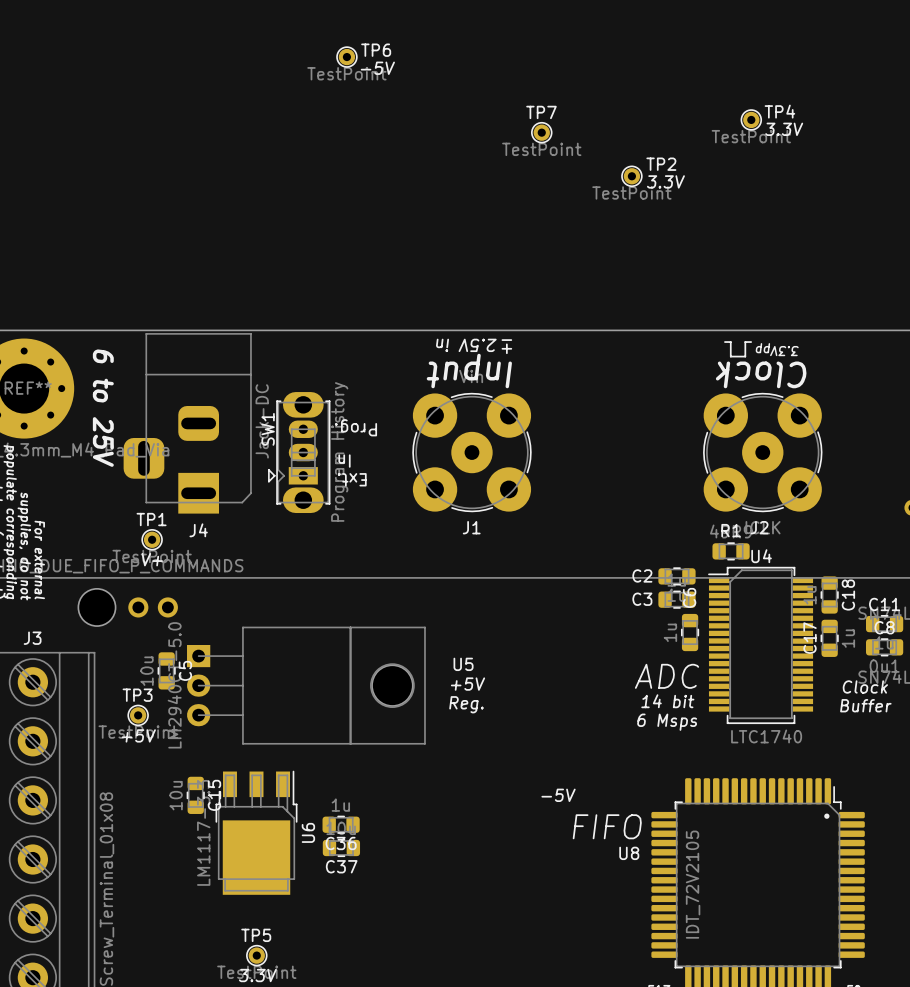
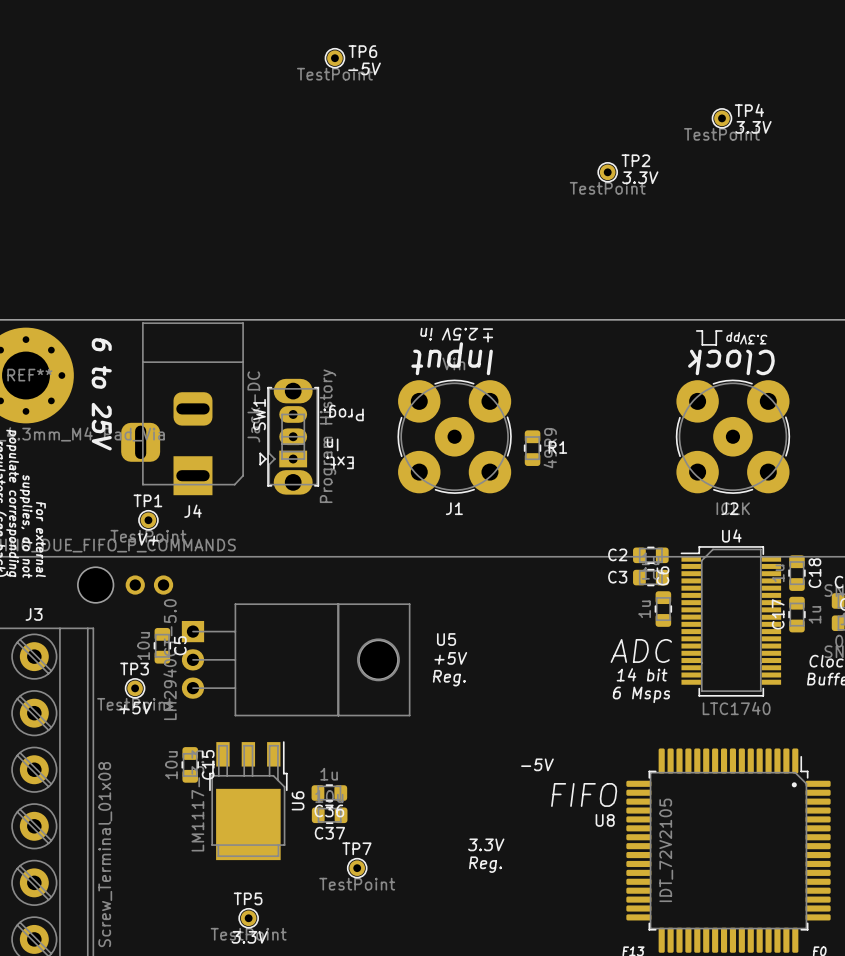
TP7 position: (541, 132) -> (357, 868)
R1 rotation: 0° (731, 551) -> 90° clockwise (532, 448)
R1 position: (731, 551) -> (532, 448)
text: none -> 3.3V (486, 844)
text: none -> Reg. (485, 864)

